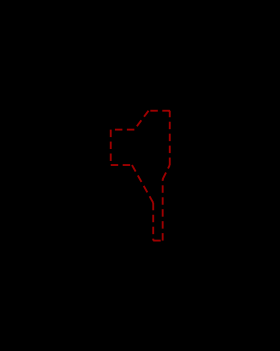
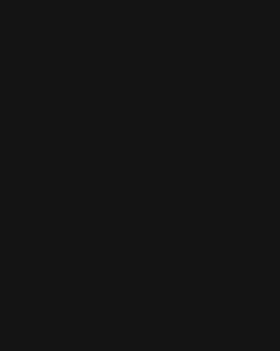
zone outline: (148, 110) (169, 110) (169, 165) (162, 179) (162, 240) (153, 240) (153, 202) (131, 165) (110, 165) (110, 129) (134, 129) (148, 110) -> none

